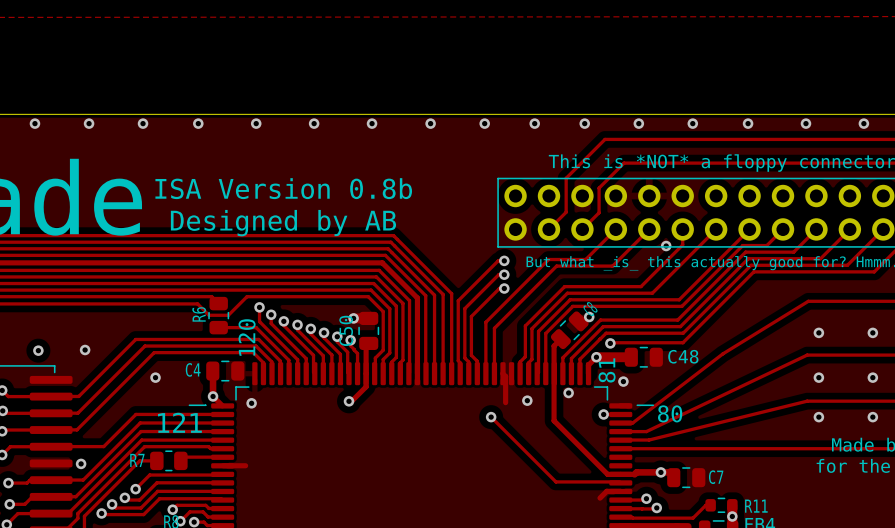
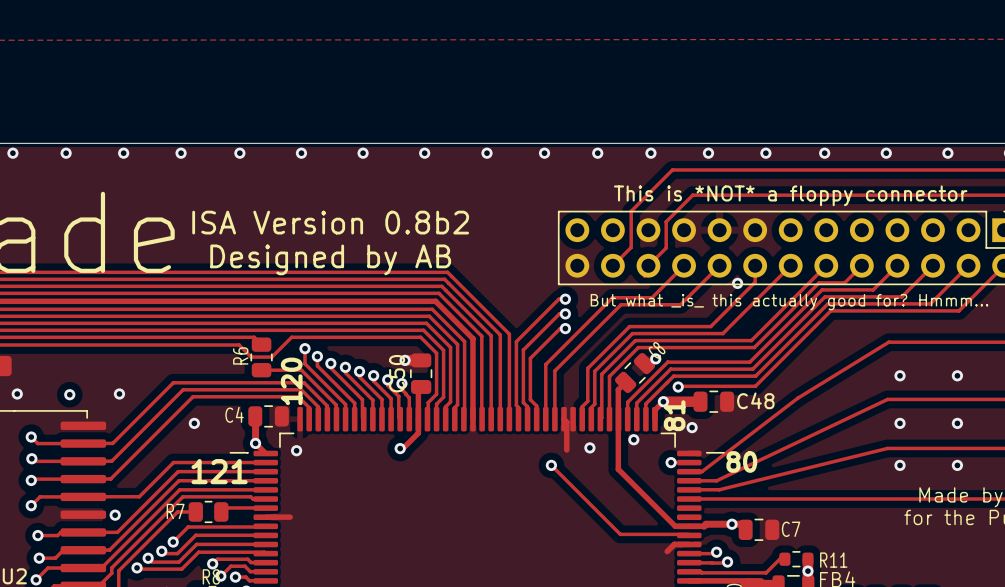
text: ISA Version 0.8b (283, 188) -> ISA Version 0.8b2 (330, 222)

